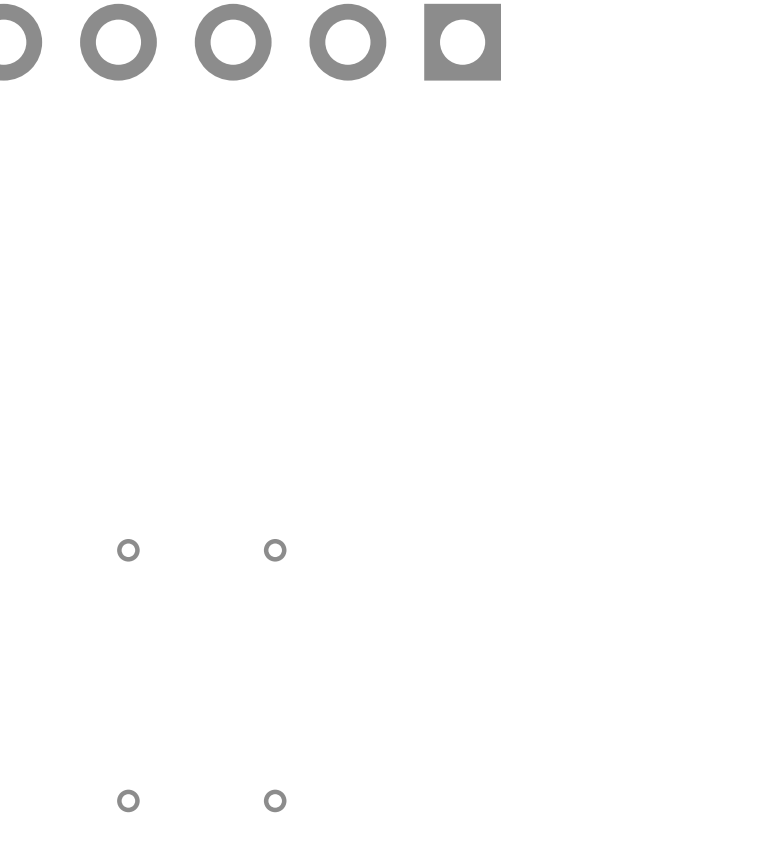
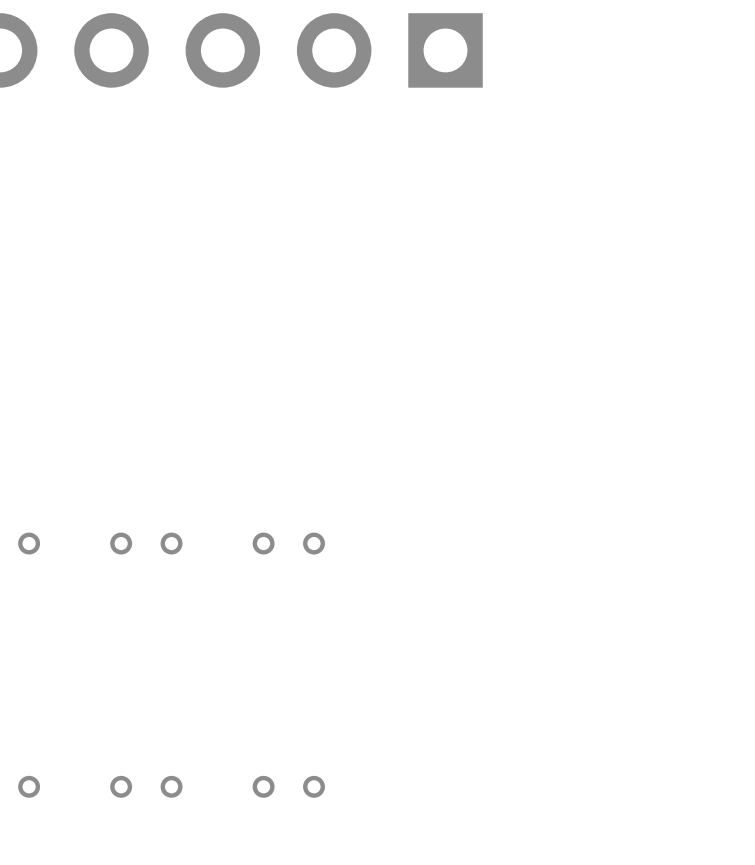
via: none -> (29, 543)
via: none -> (171, 543)
via: none -> (314, 543)
via: none -> (29, 786)
via: none -> (171, 786)
via: none -> (314, 786)

